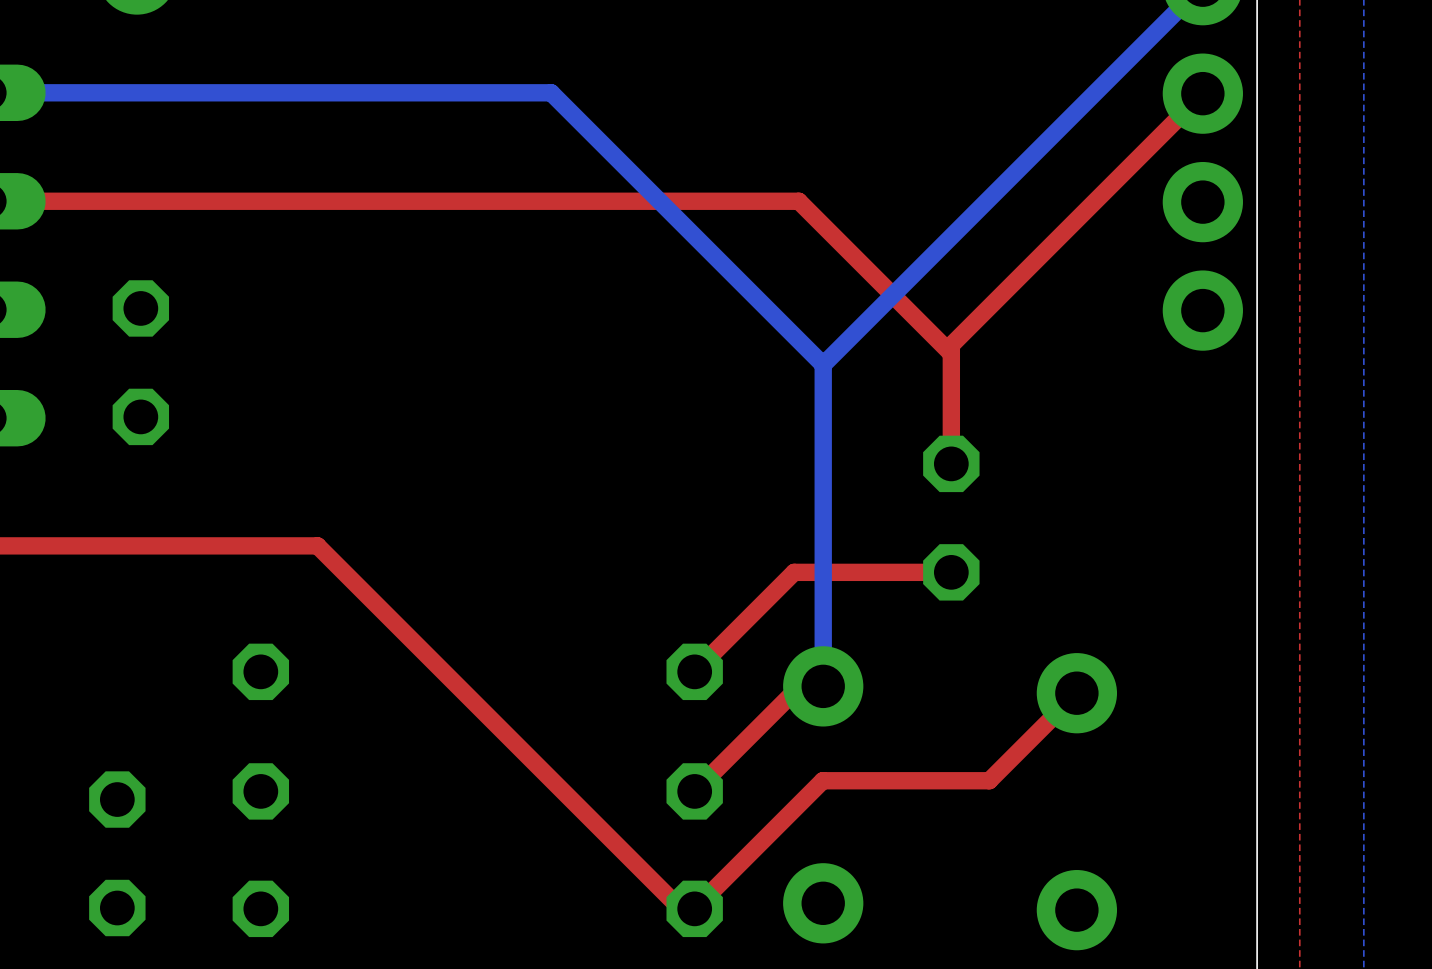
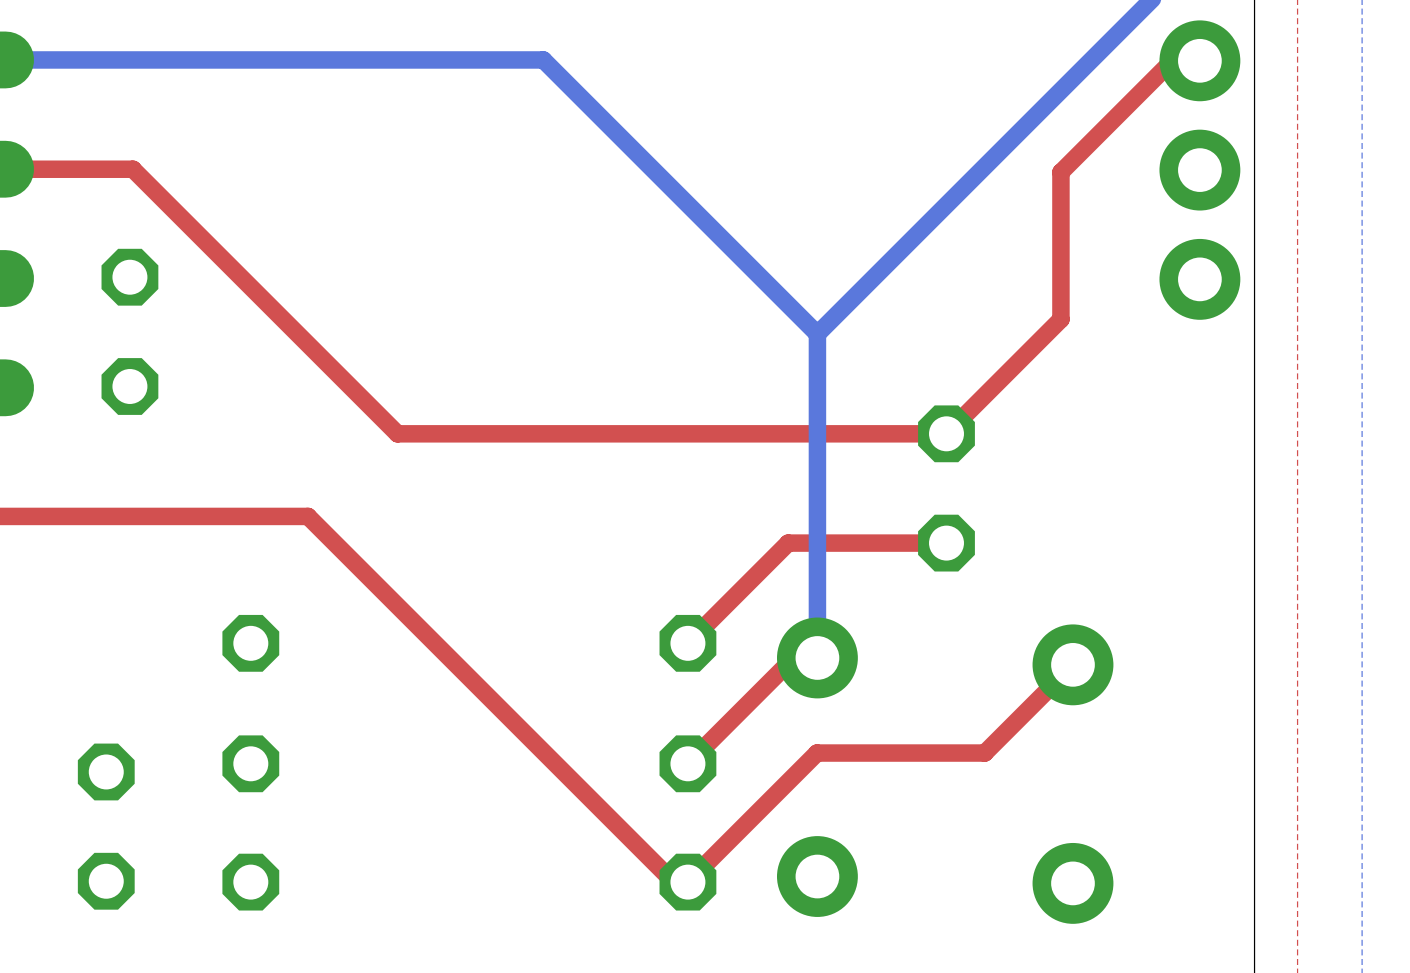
top track: (1202, 93) (951, 345) (951, 463) -> none
top track: (143, 201) (798, 201) (951, 353) -> (132, 169) (397, 433) (946, 433) (1060, 319) (1060, 172) (1172, 60) (1199, 60)

